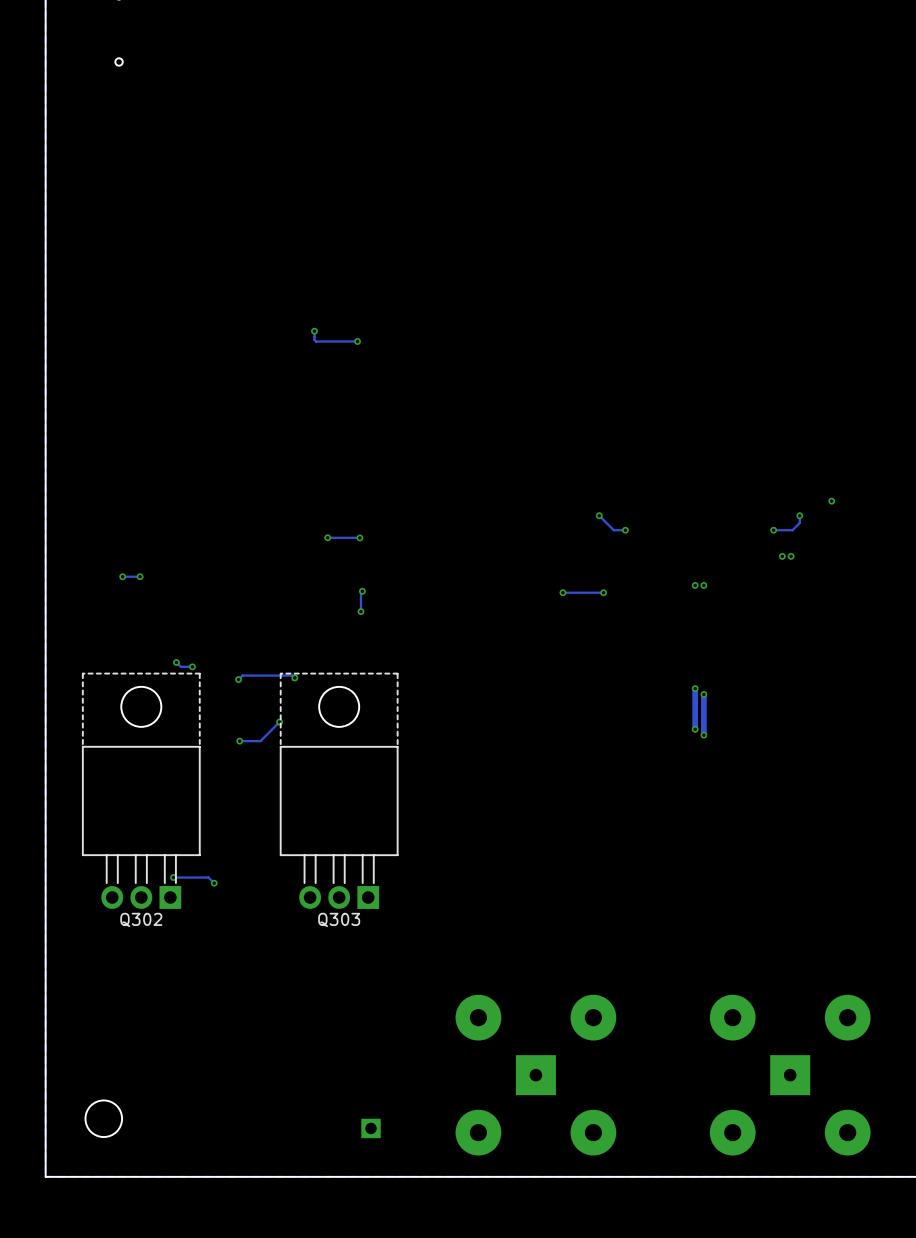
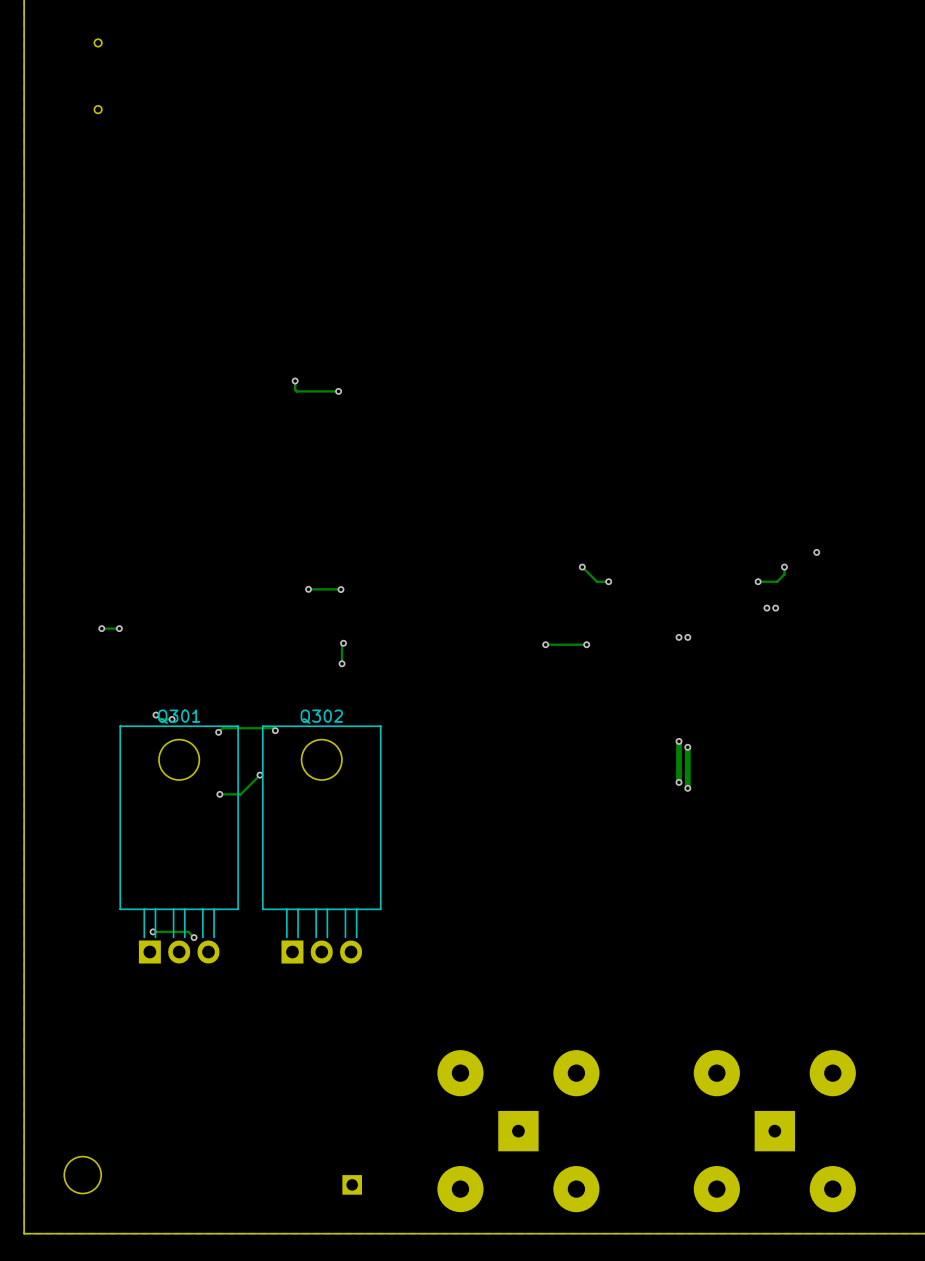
Q302 footprint: [82, 672, 201, 909] -> [262, 725, 382, 964]
Q301: none -> (179, 844)
Q303: (339, 790) -> none
Q302 name position: Q302 (141, 919) -> Q302 (321, 716)

